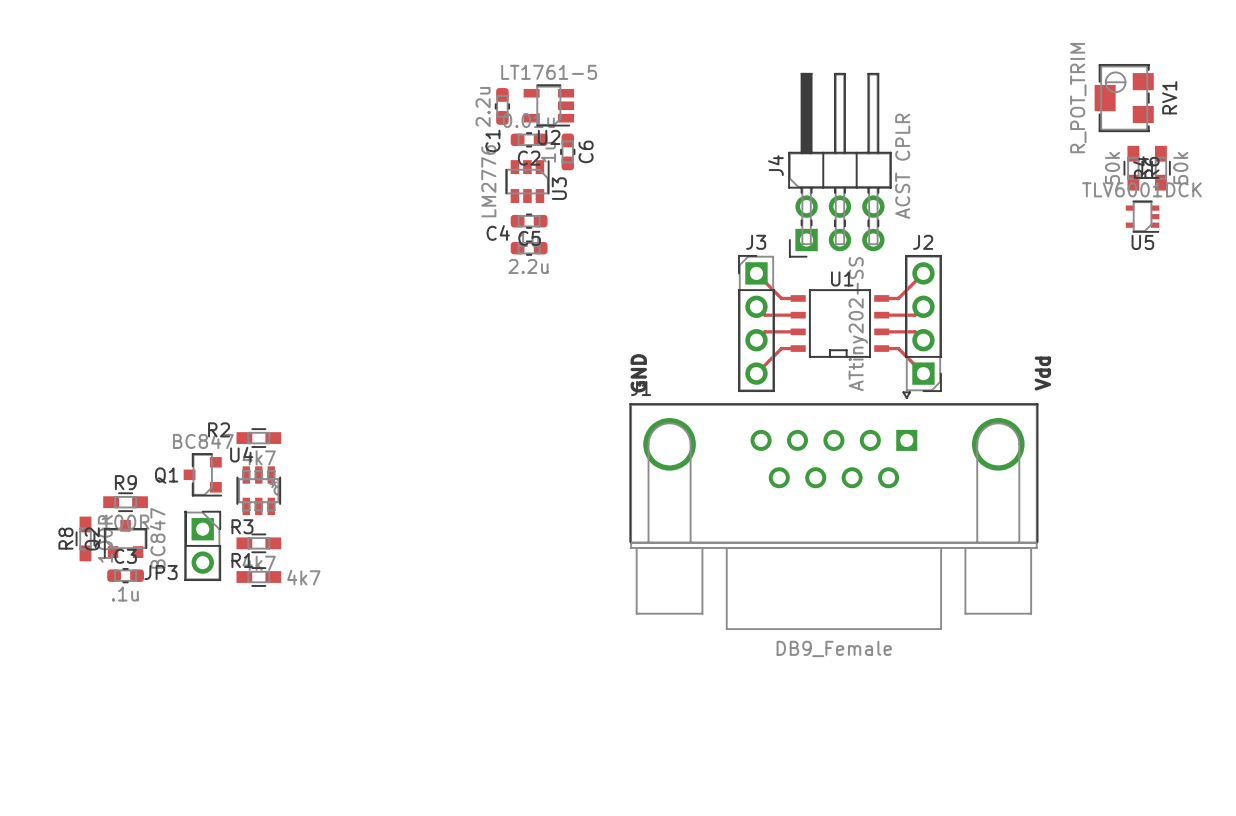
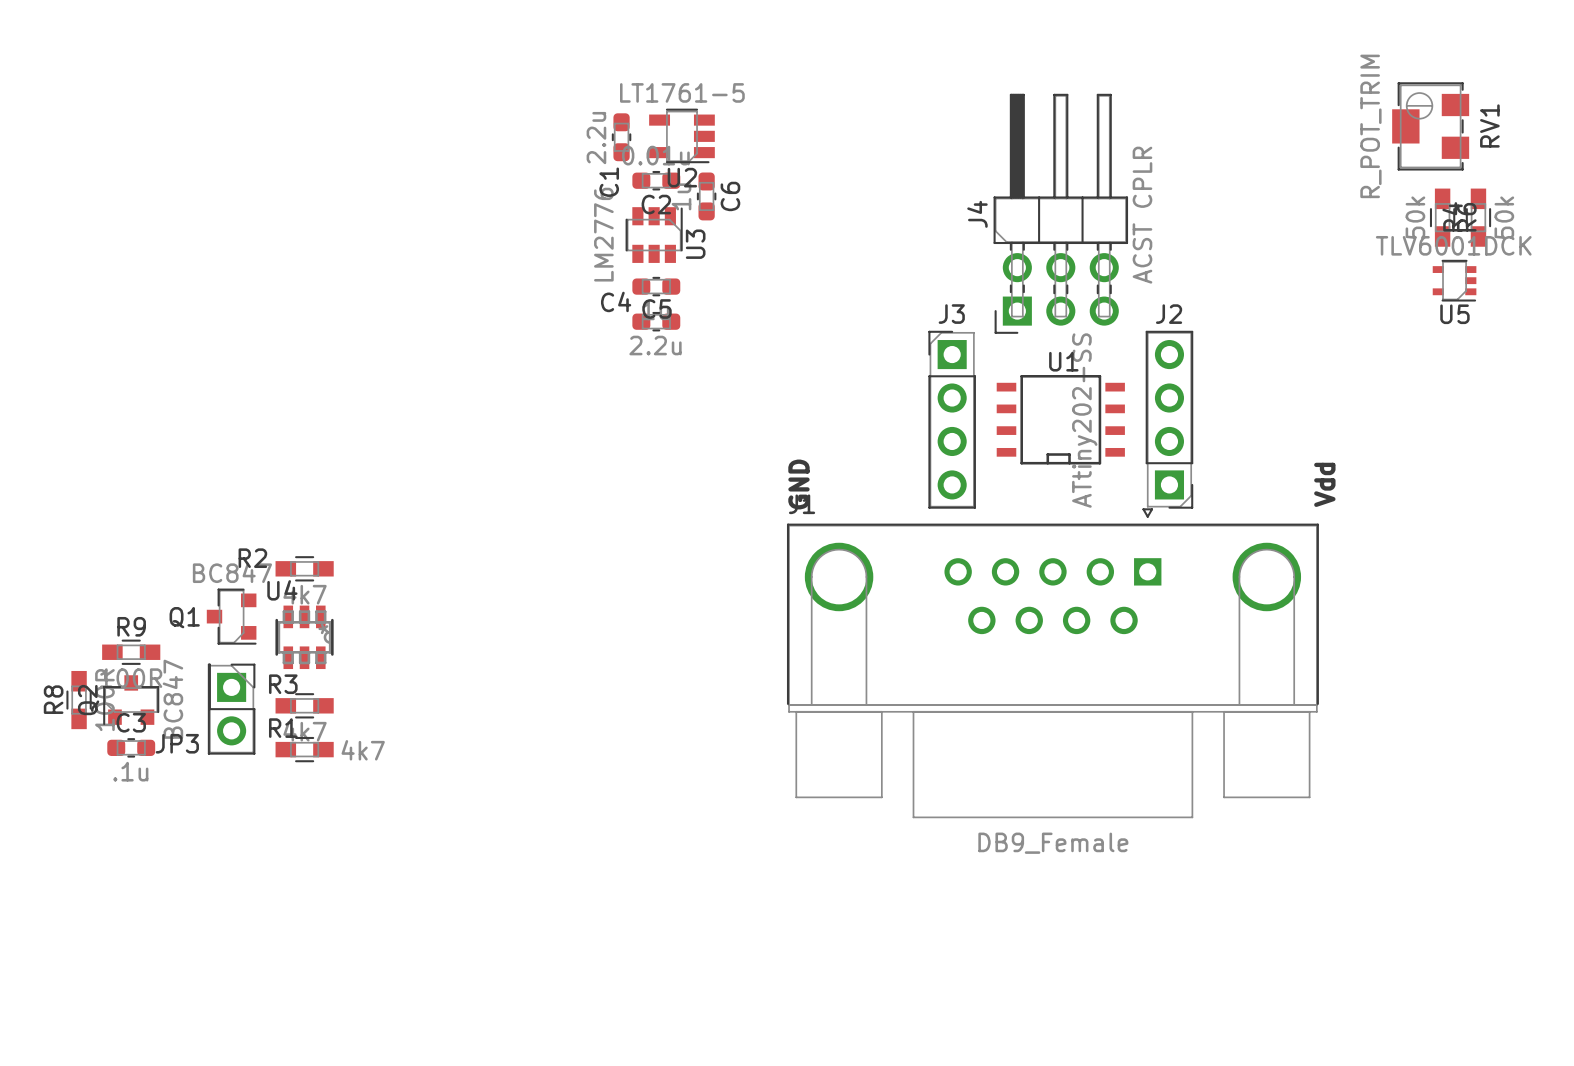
track: (756, 273) (781, 298) (798, 298) -> none
track: (923, 273) (898, 298) (881, 298) -> none
track: (756, 306) (764, 315) (798, 315) -> none
track: (923, 306) (915, 315) (881, 315) -> none
track: (798, 331) (764, 331) (756, 340) -> none
track: (881, 331) (915, 331) (923, 340) -> none
track: (798, 348) (781, 348) (756, 373) -> none
track: (881, 348) (898, 348) (923, 373) -> none

